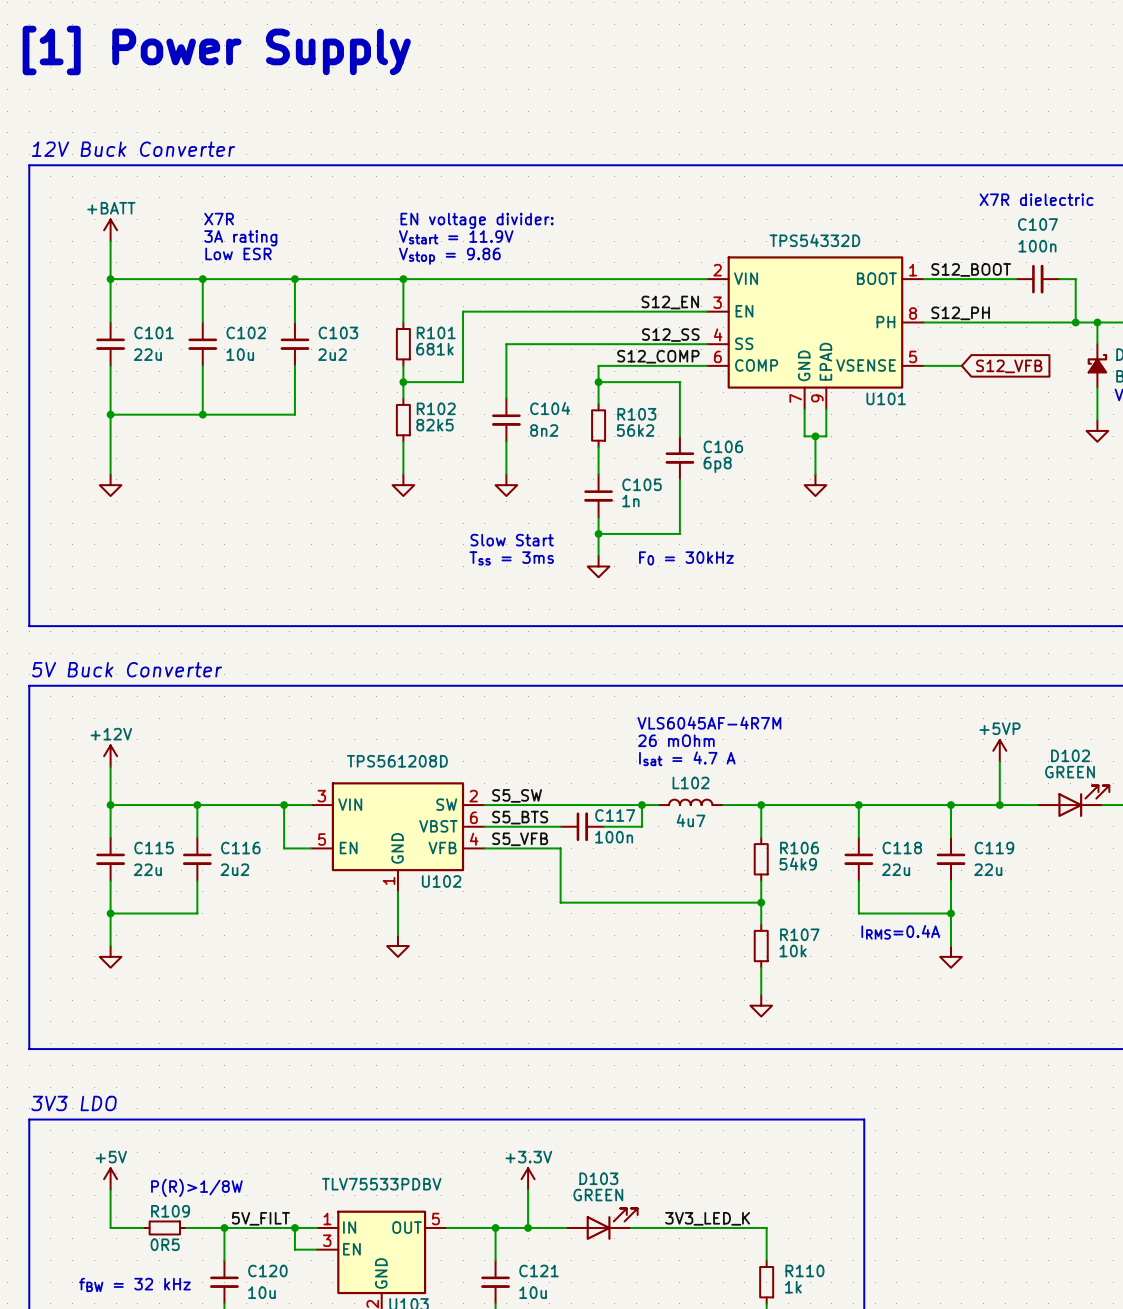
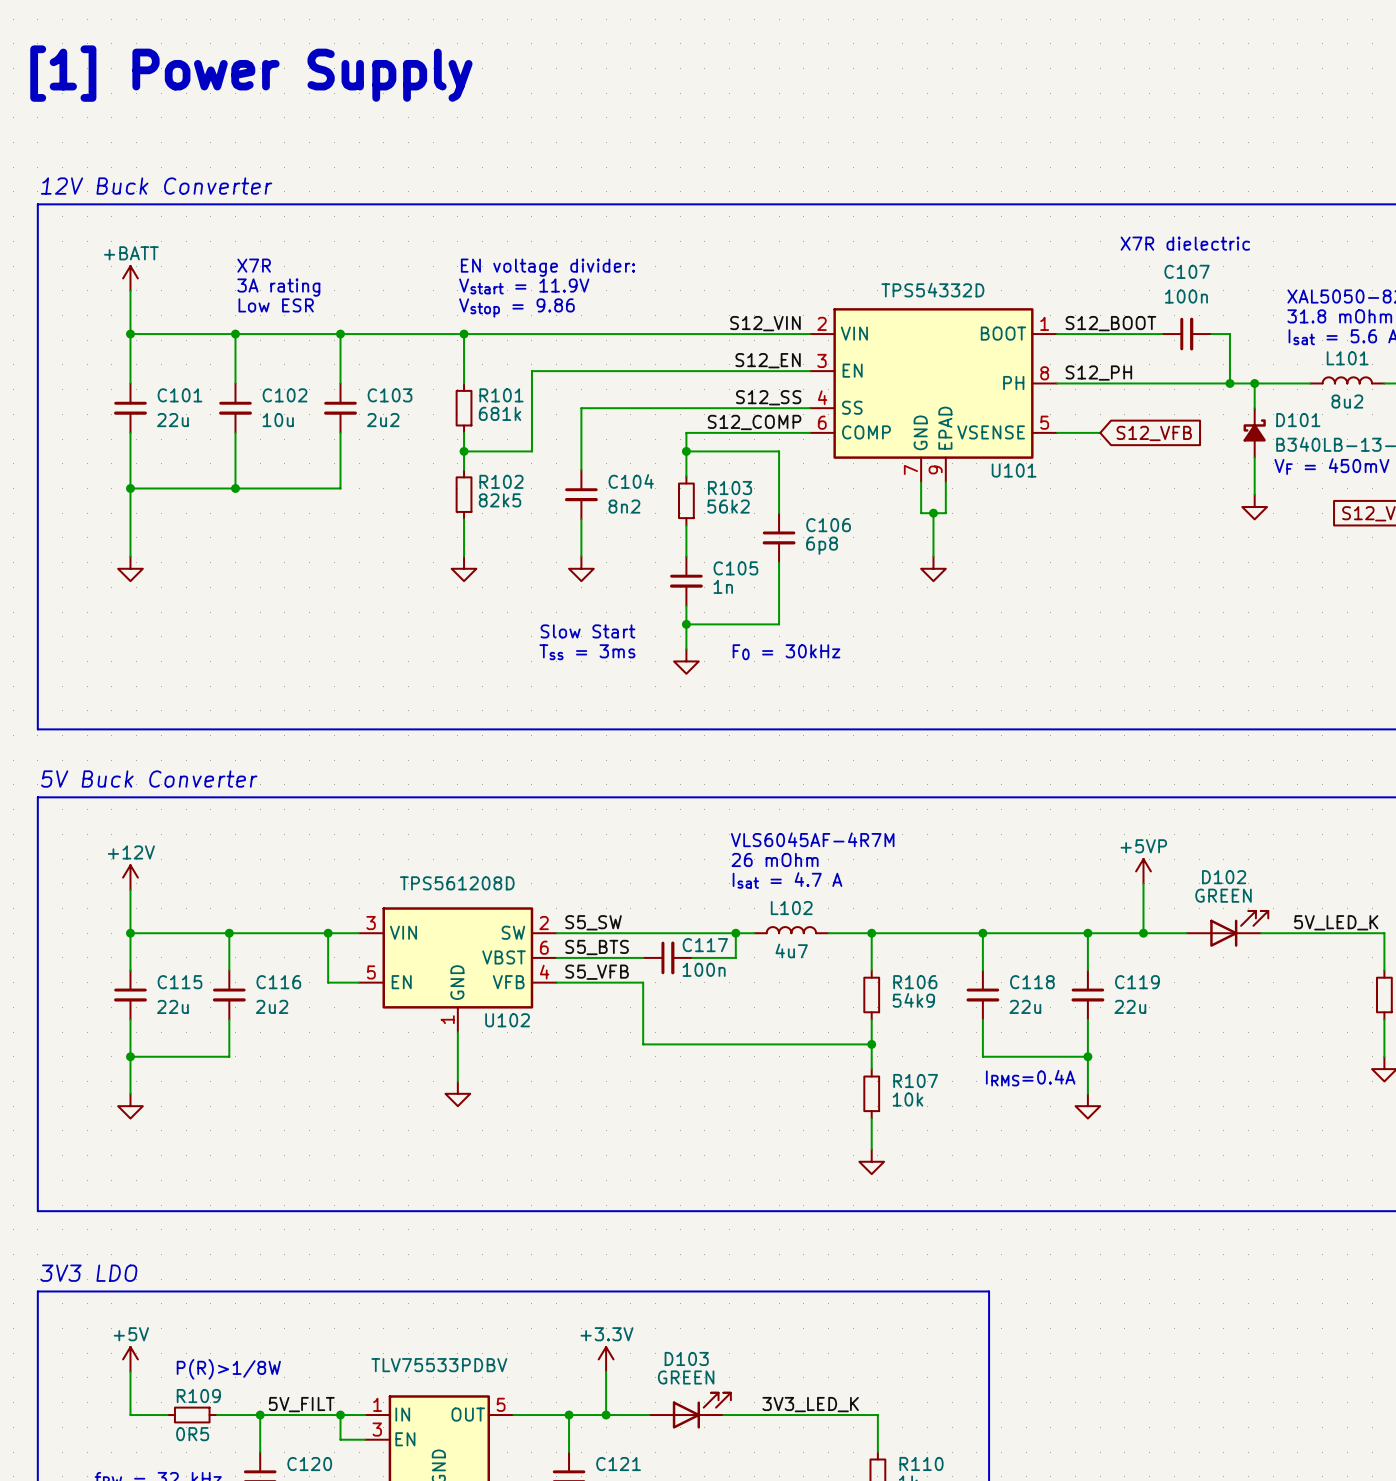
label: none -> S12_VIN (765, 323)

